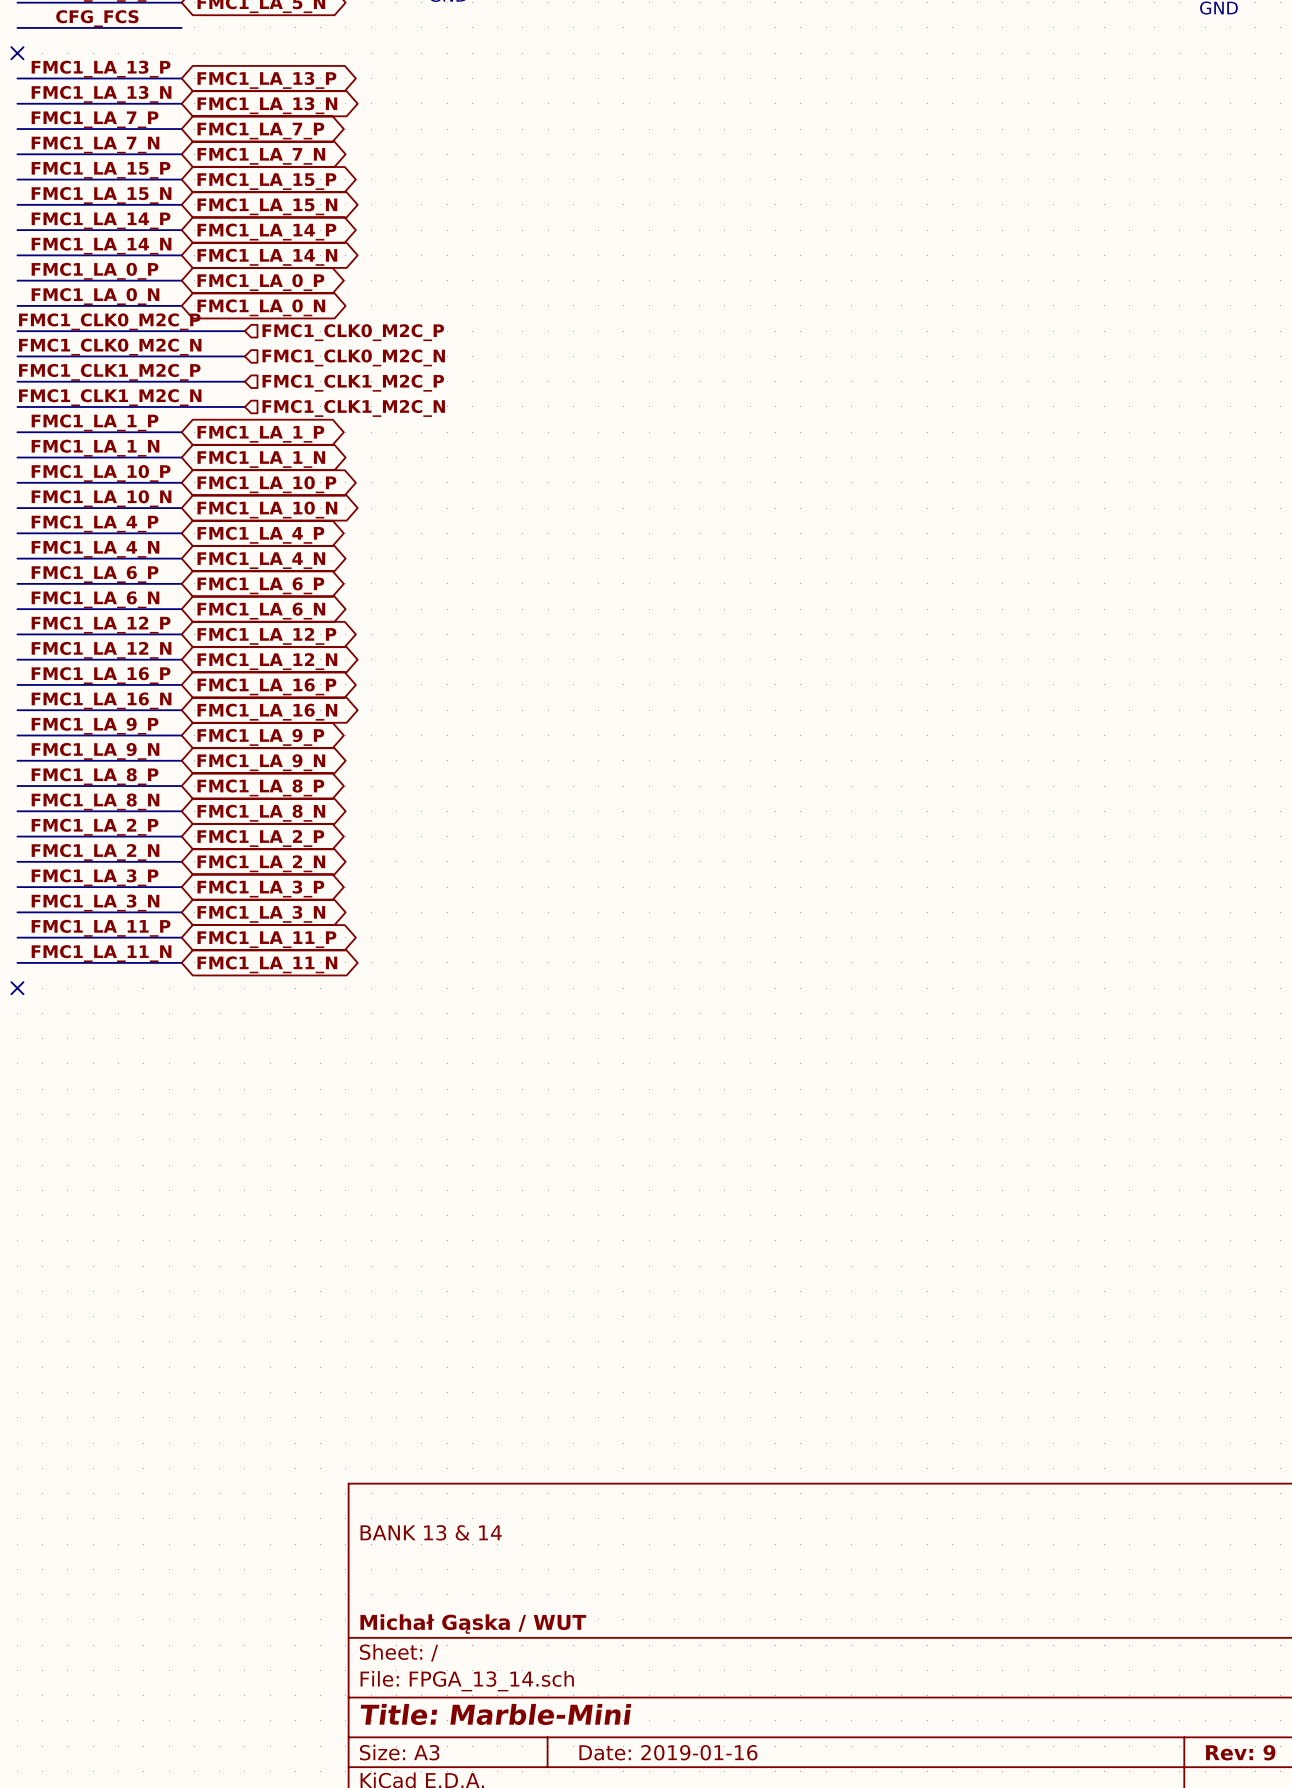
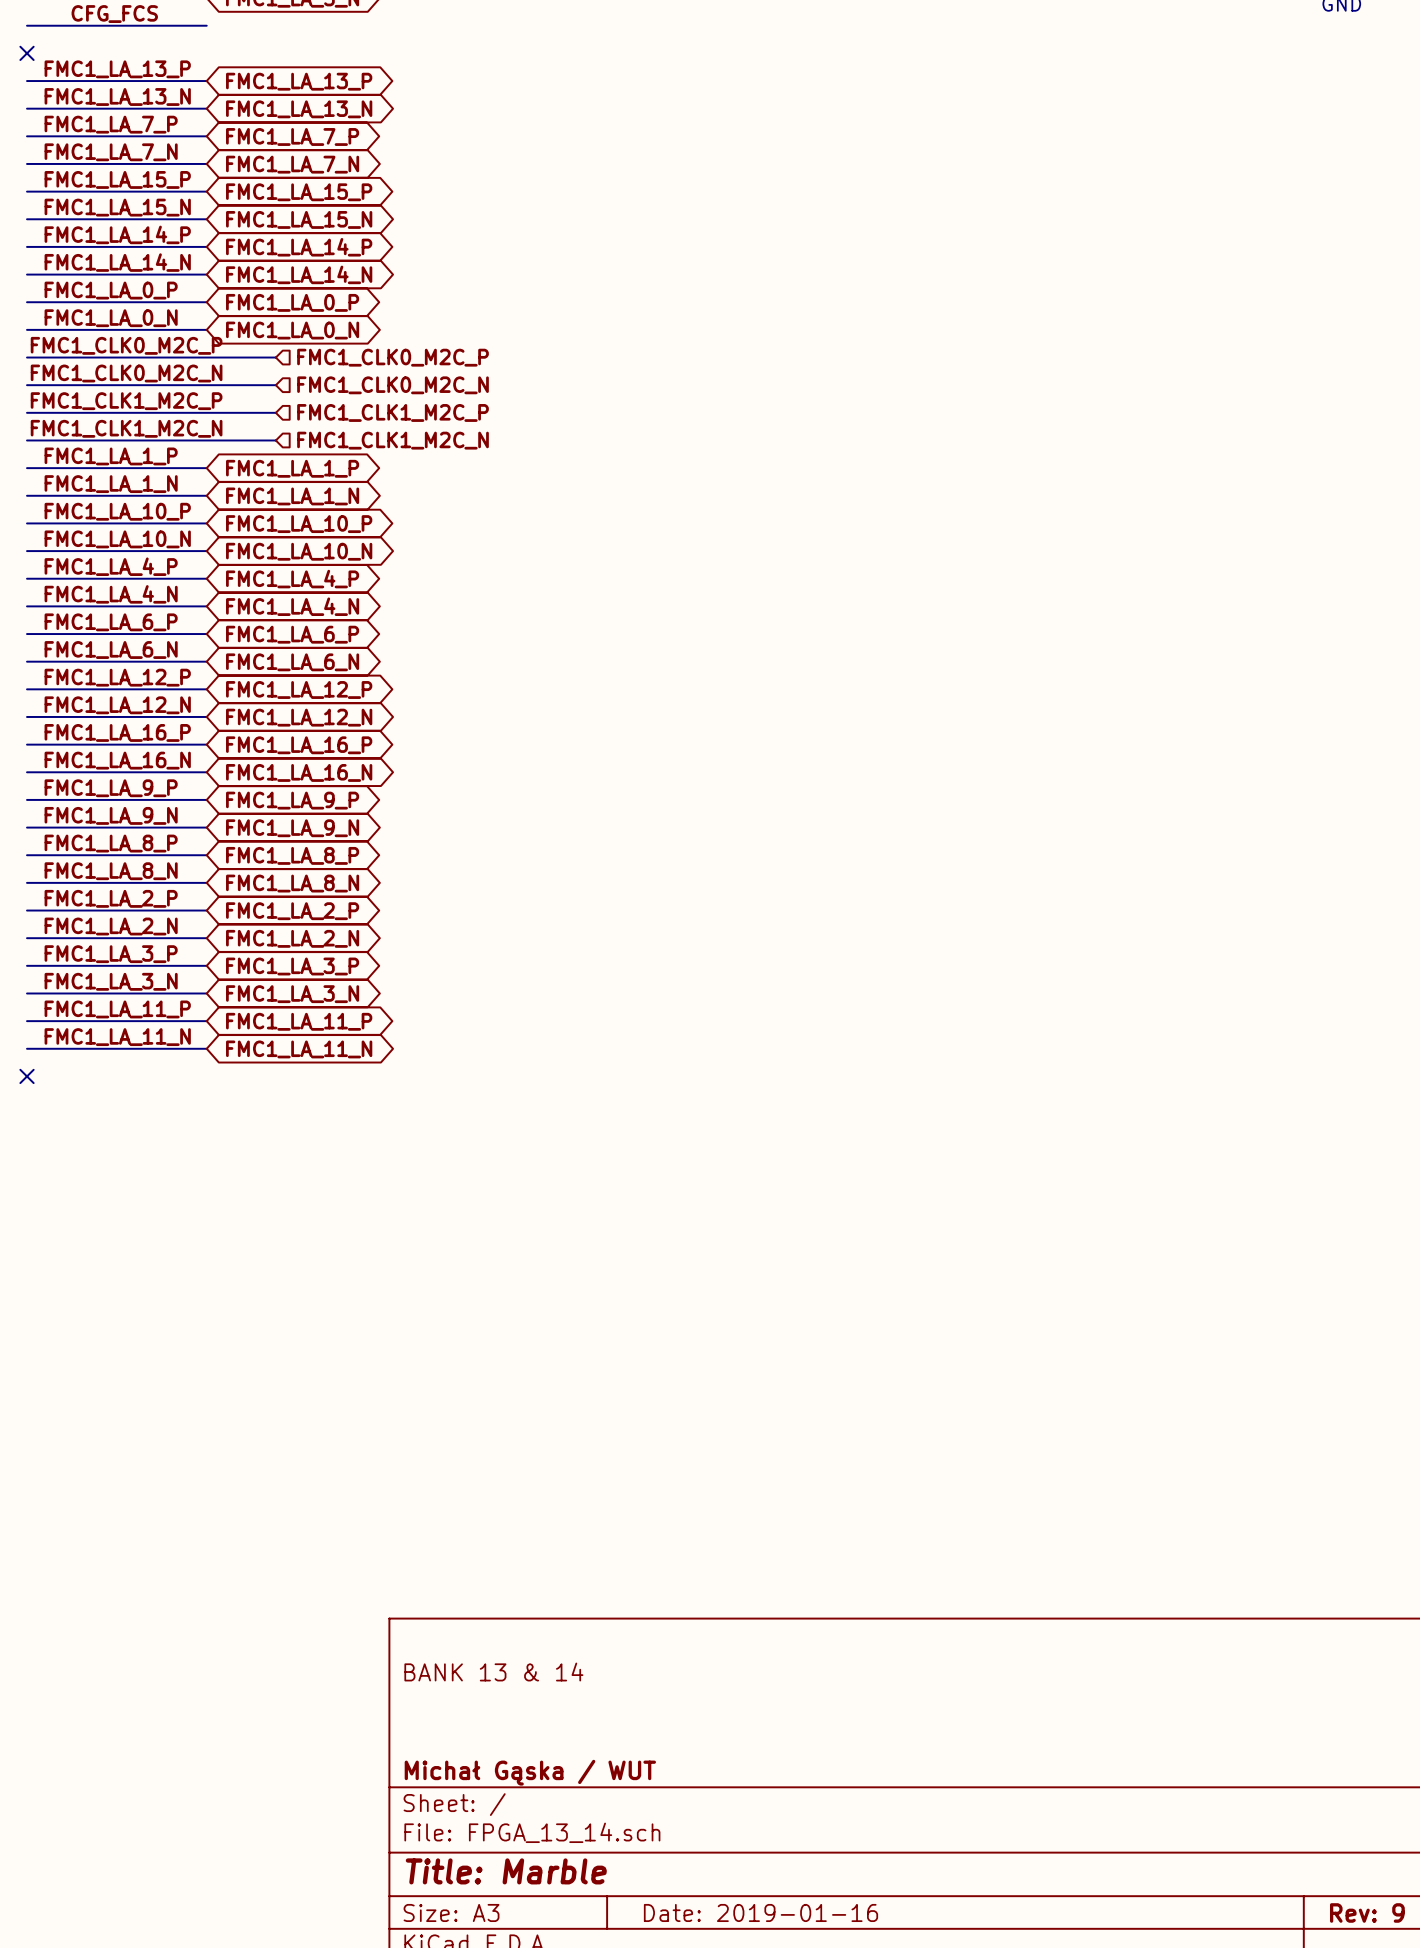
title block: Title: Marble-Mini (495, 1714) -> Title: Marble (506, 1871)

